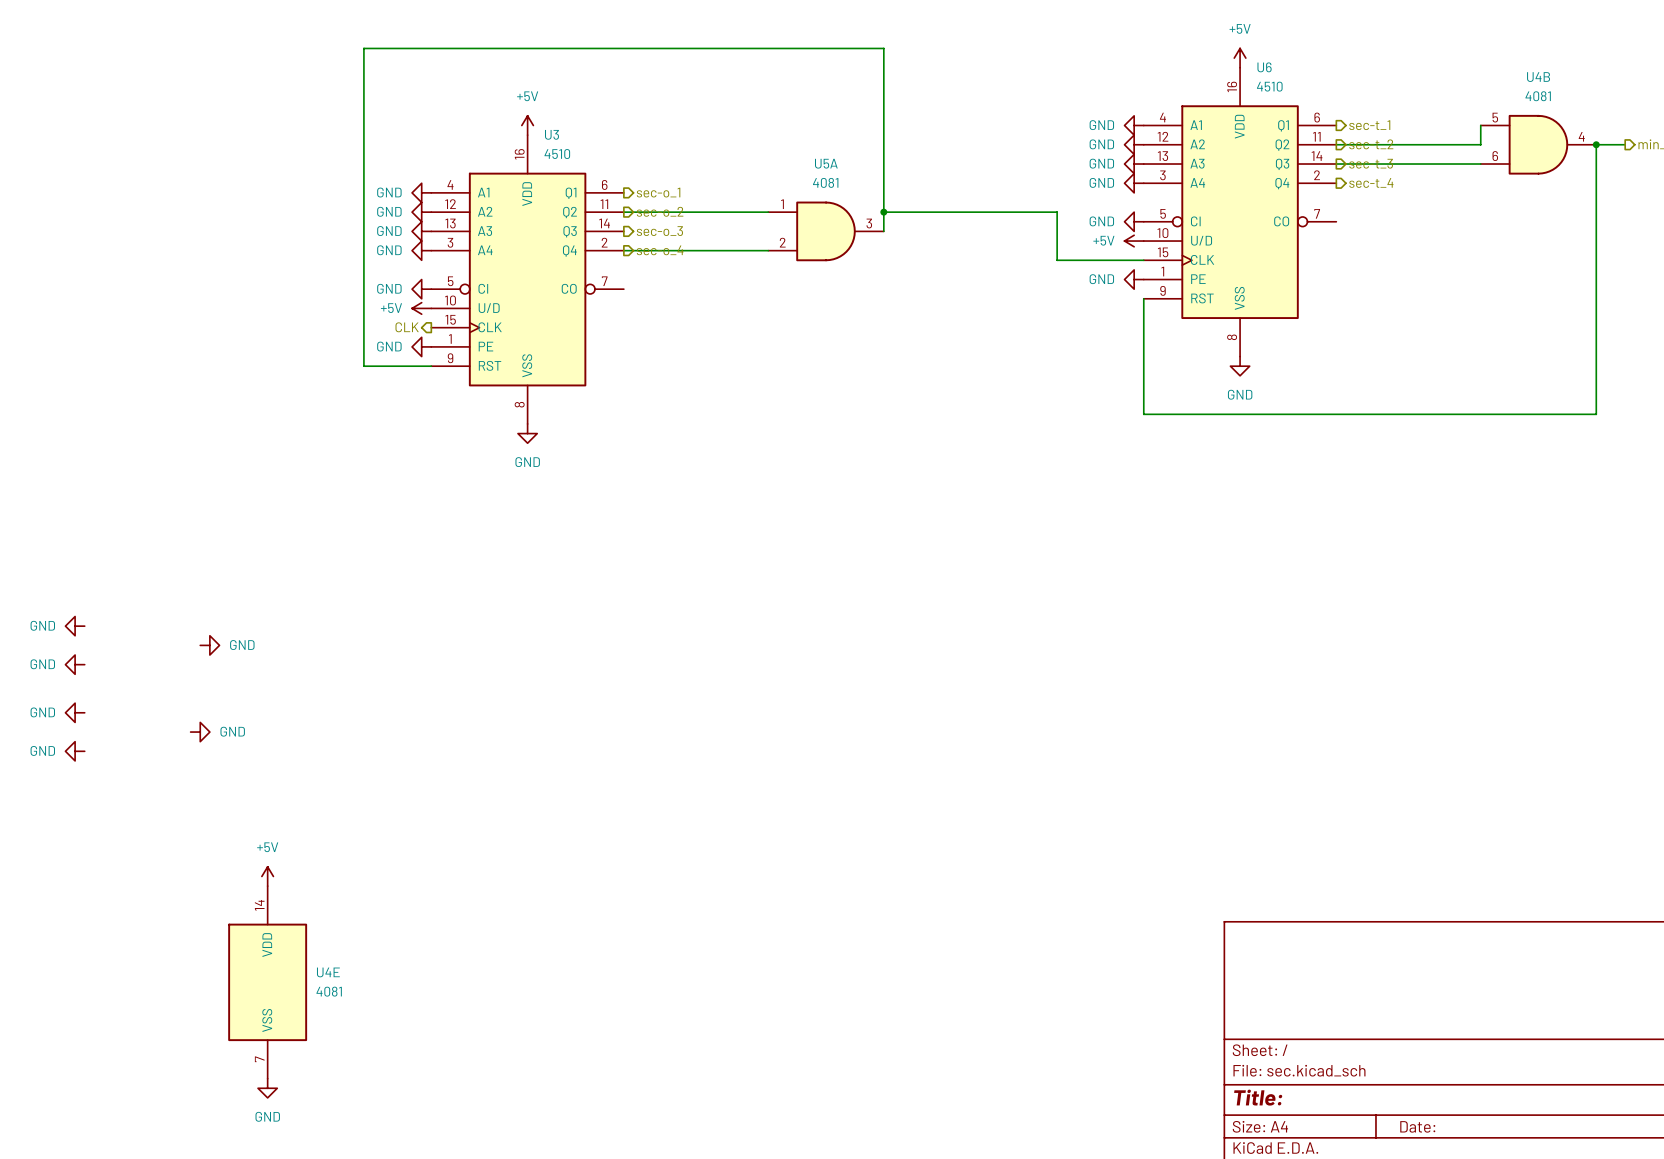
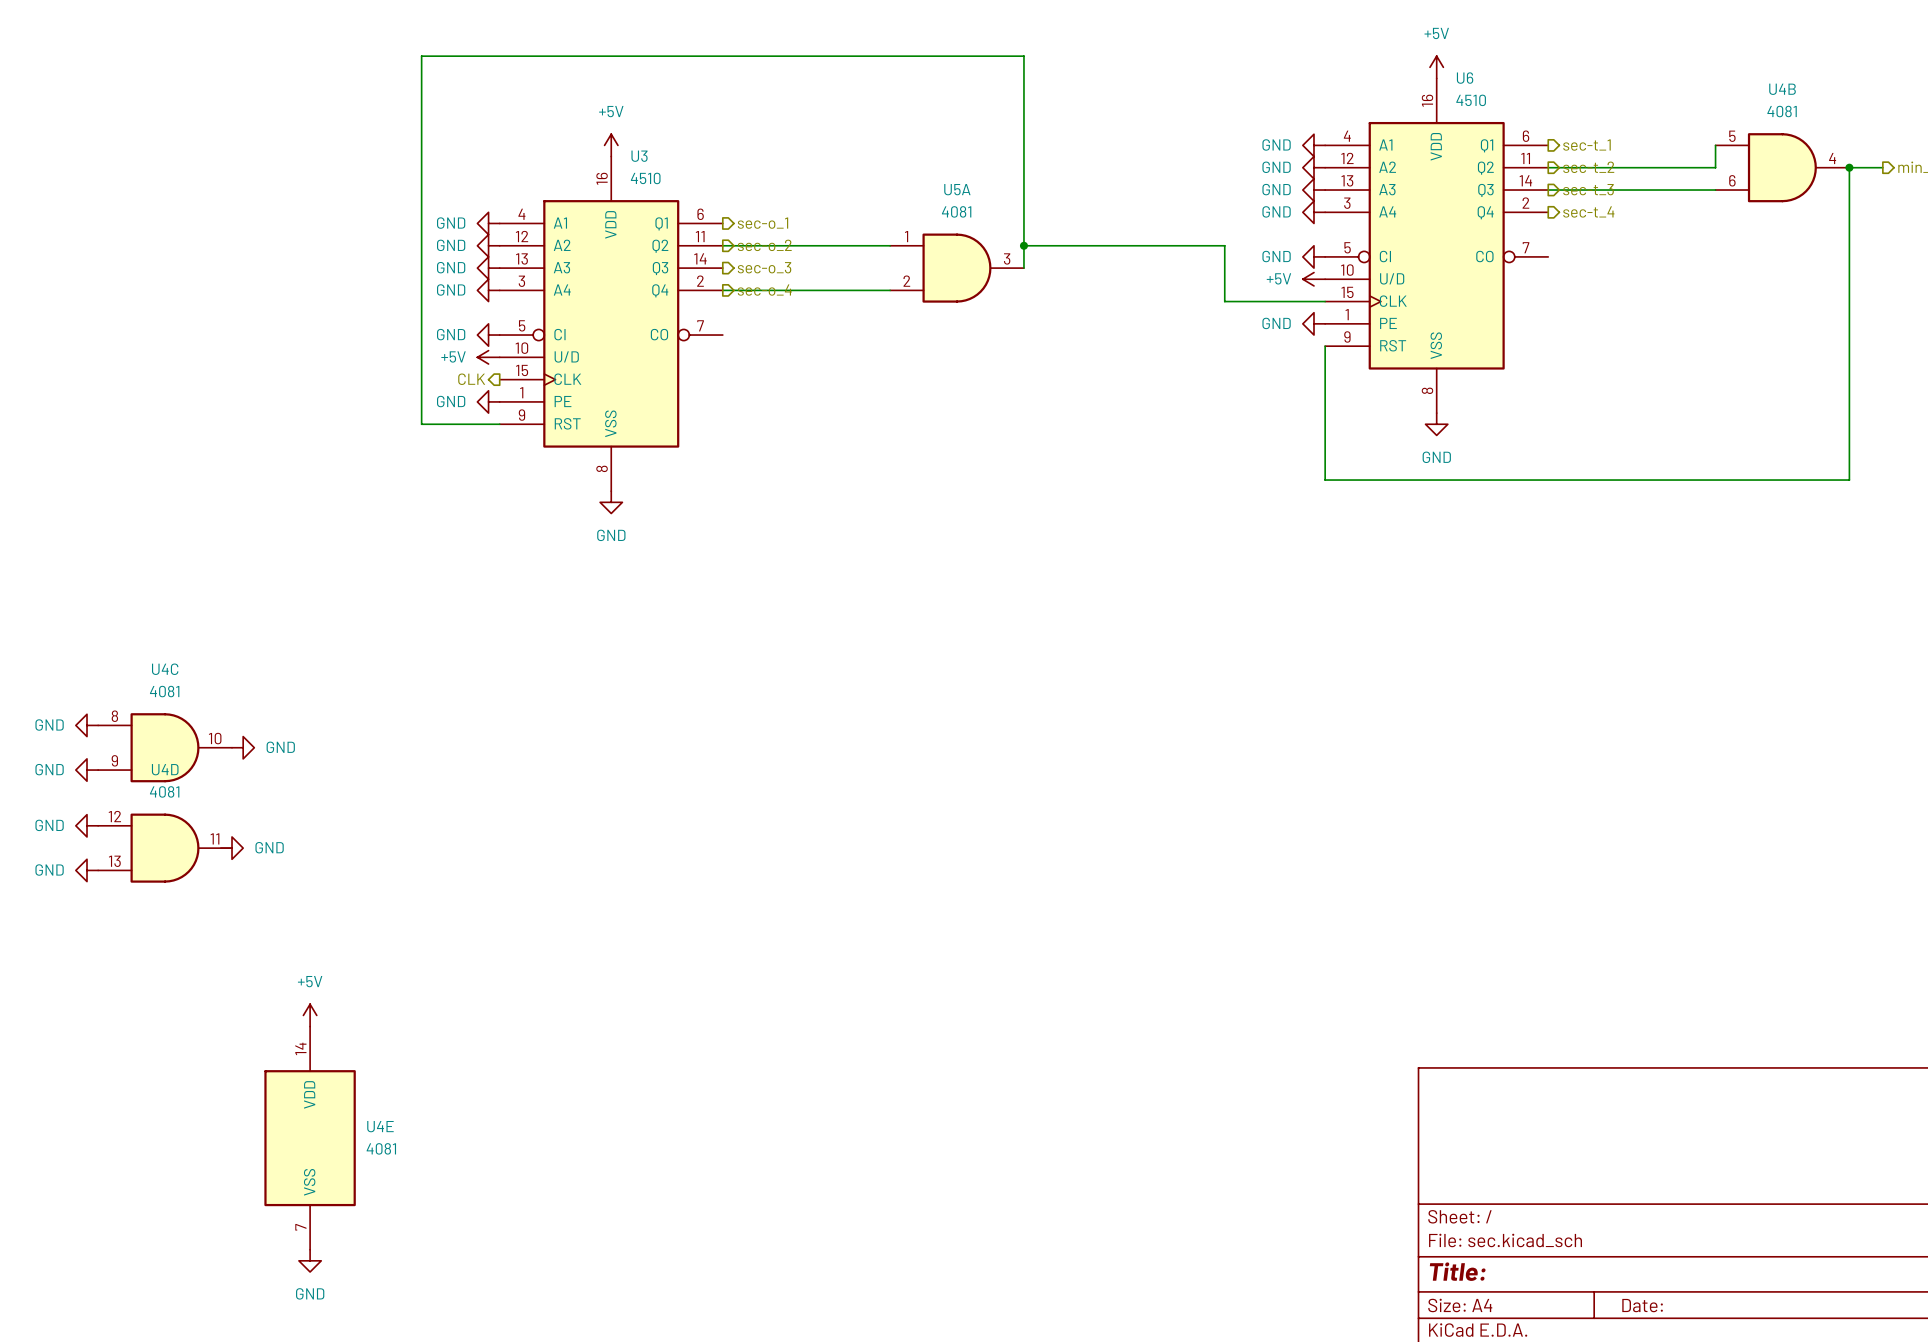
U4C: none -> 4081 (165, 747)
U4D: none -> 4081 (165, 848)

